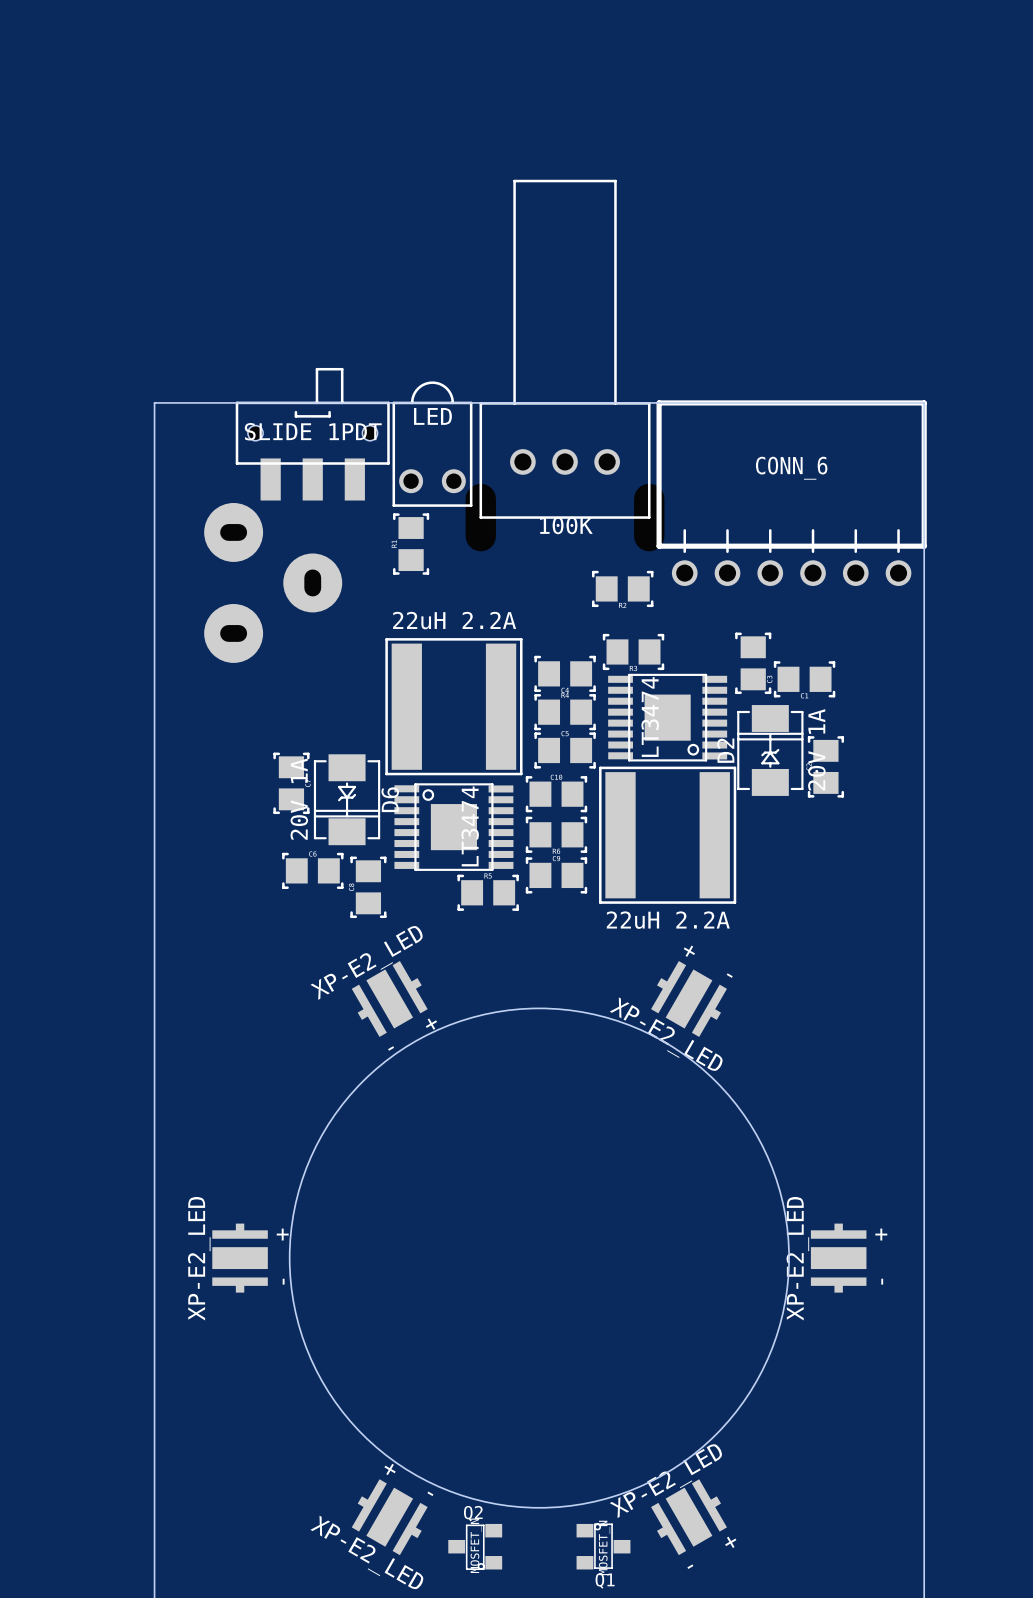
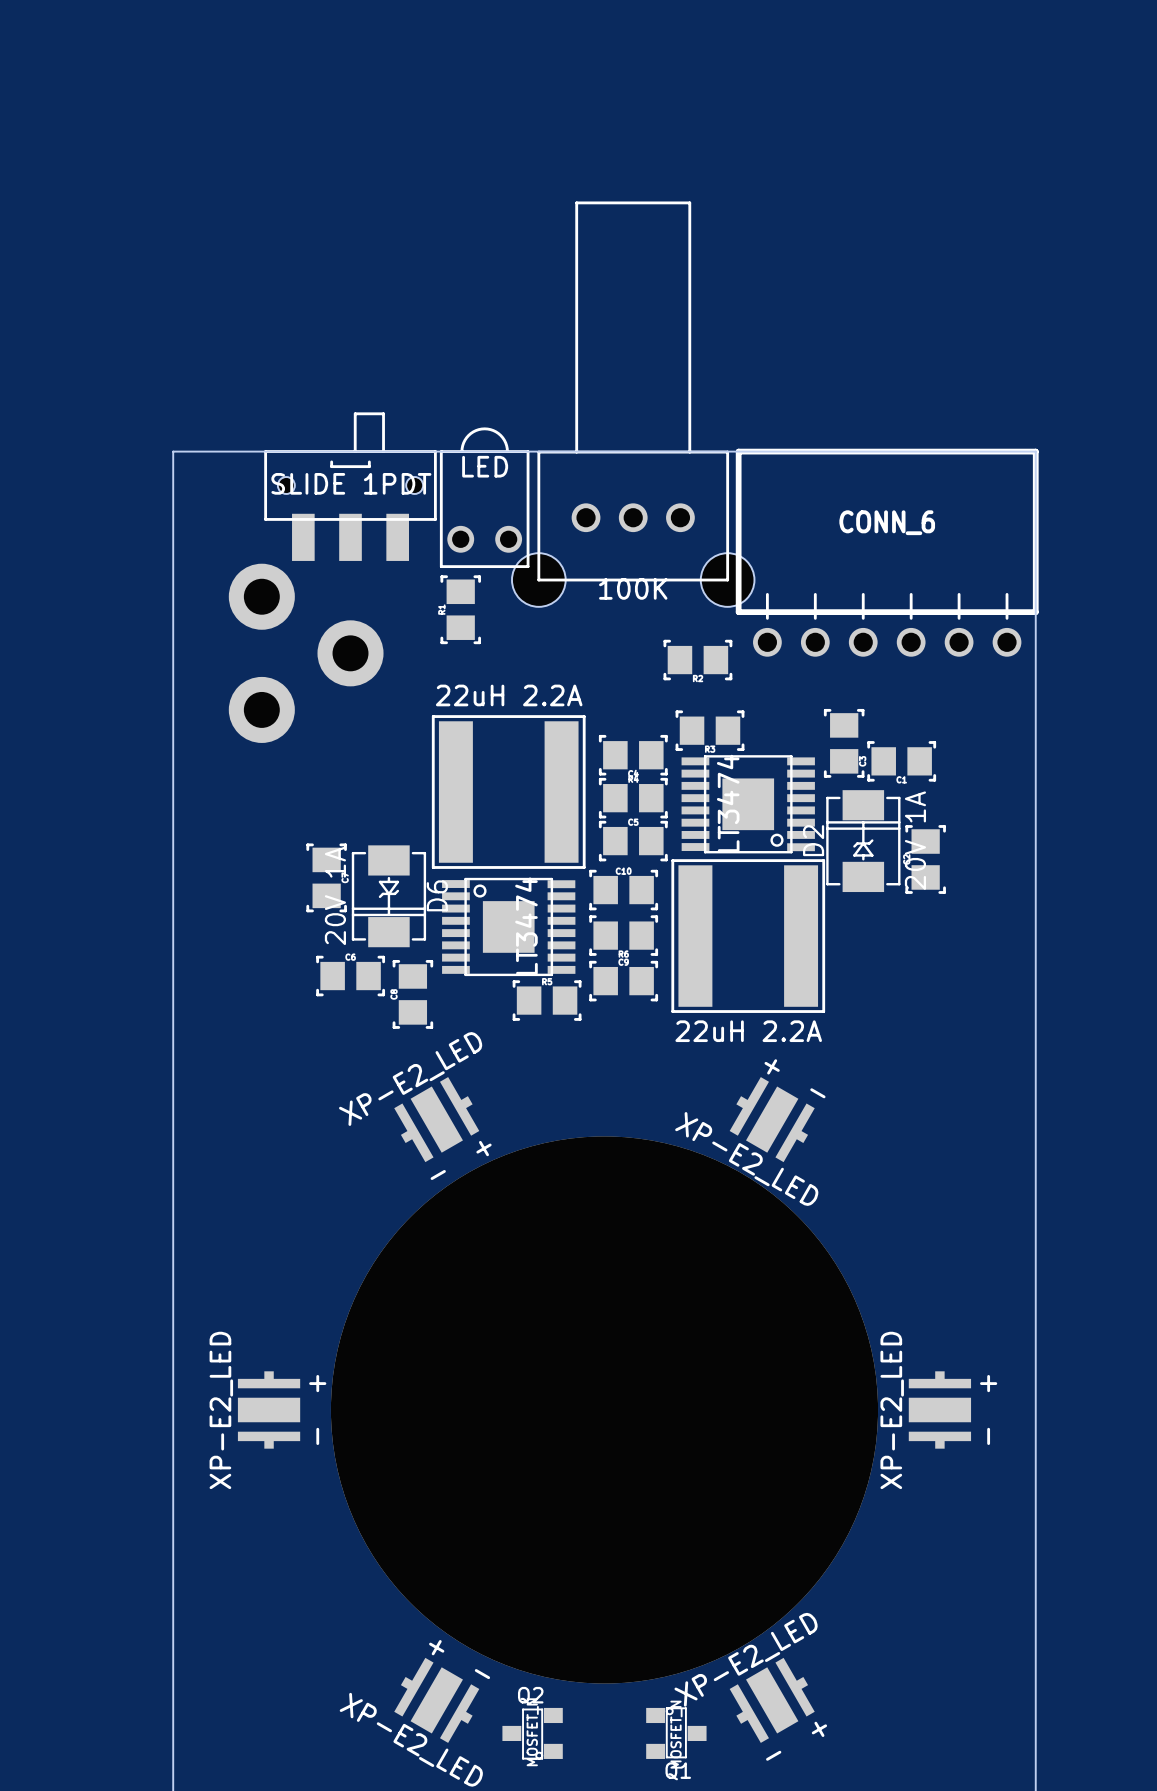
part footprint: [465, 179, 665, 552] -> [512, 201, 755, 607]
part footprint: [204, 503, 343, 663] -> [228, 563, 384, 743]
round board edge: [288, 1007, 790, 1509] -> none
part: none -> (604, 1409)

